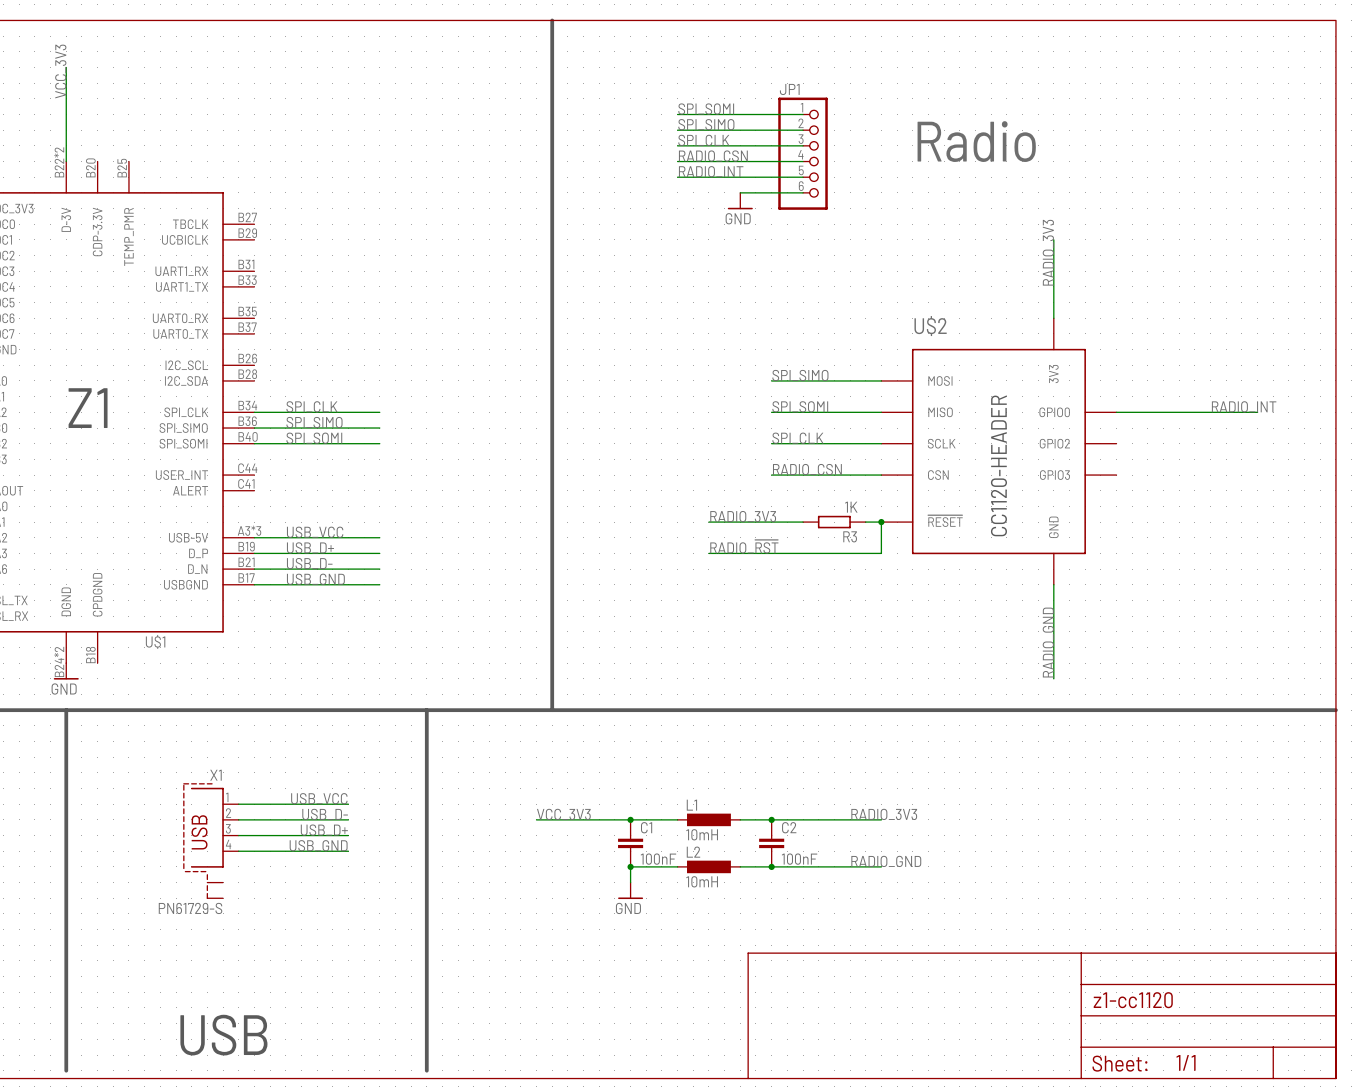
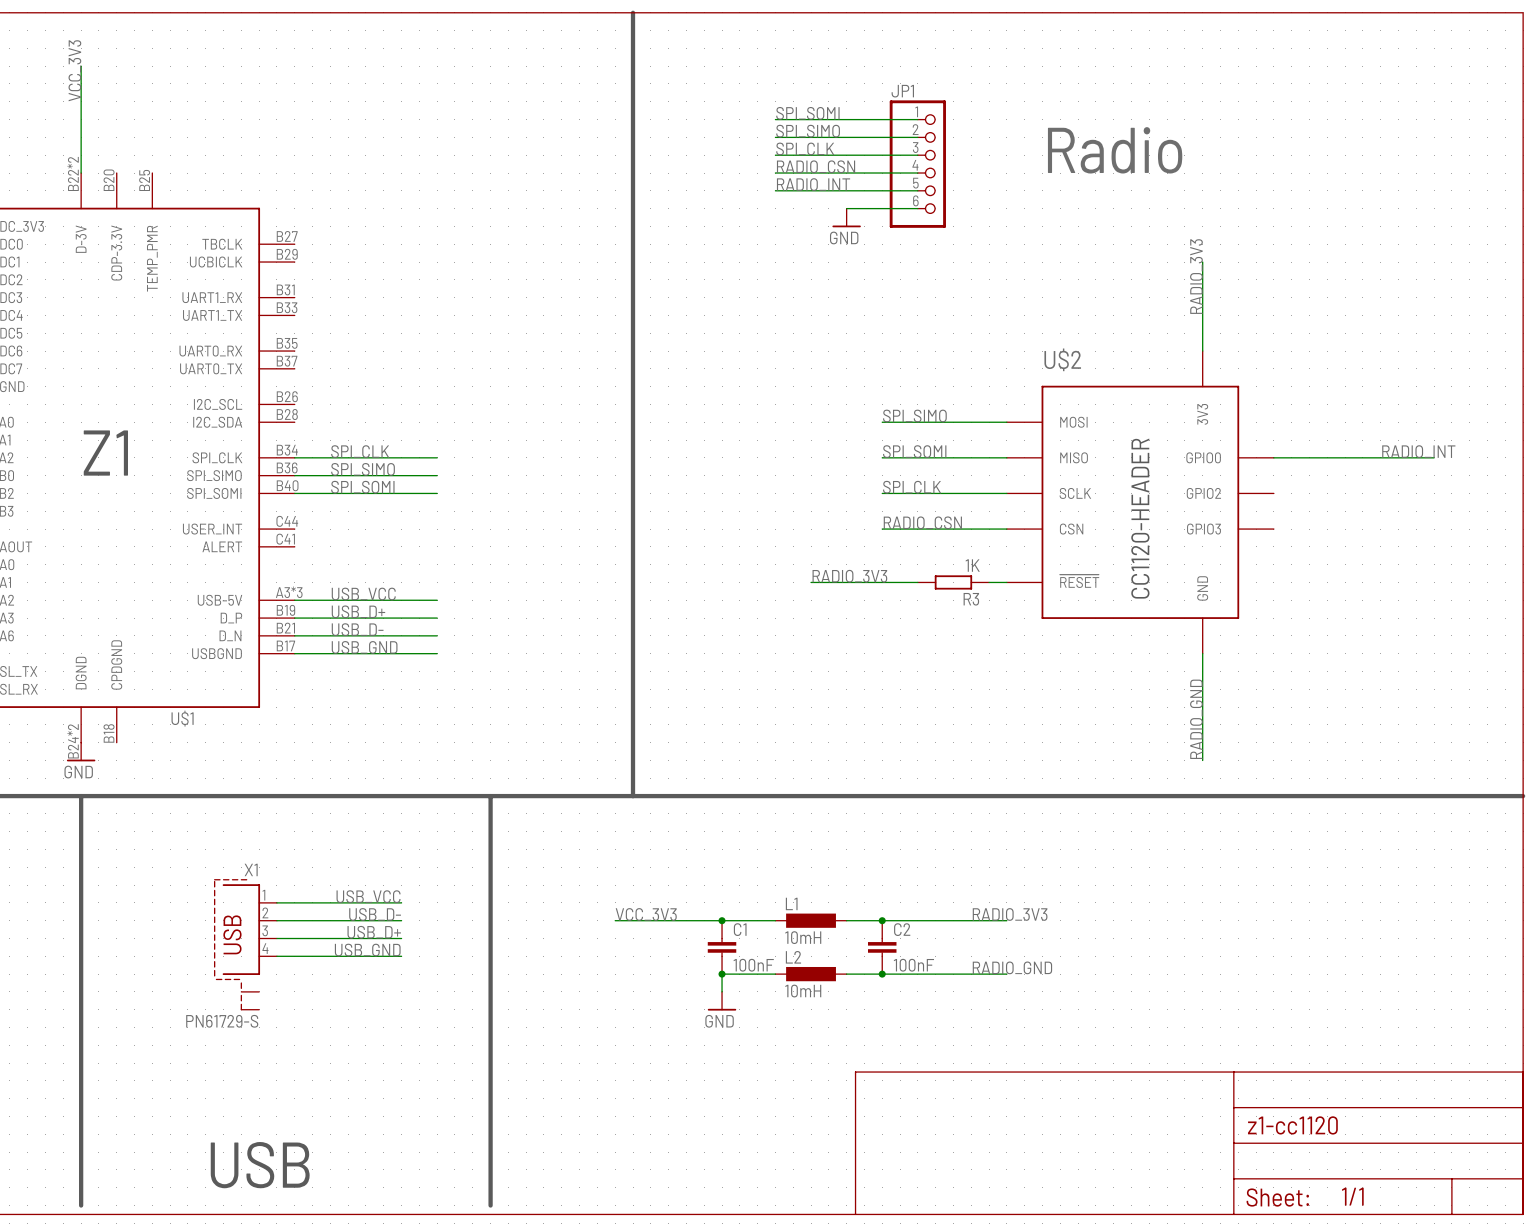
wire: (881, 522) (881, 553) (708, 553) -> none
junction: (881, 522) -> none
label: RADIO_~{RST} (744, 546) -> none

